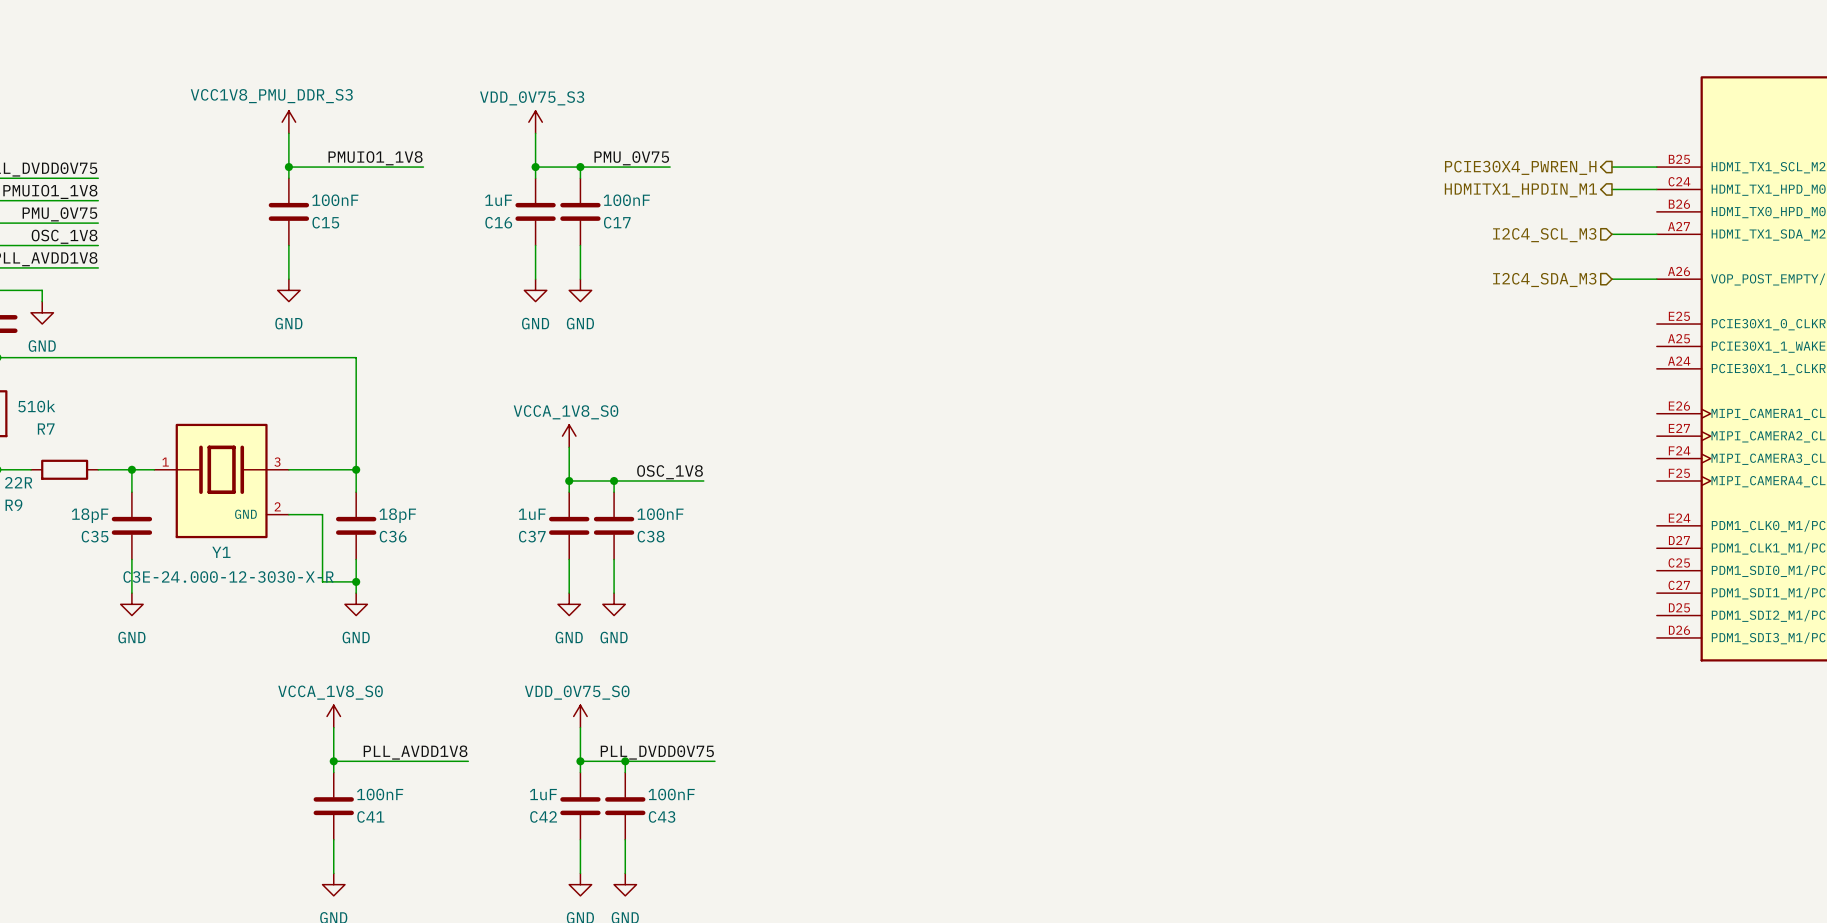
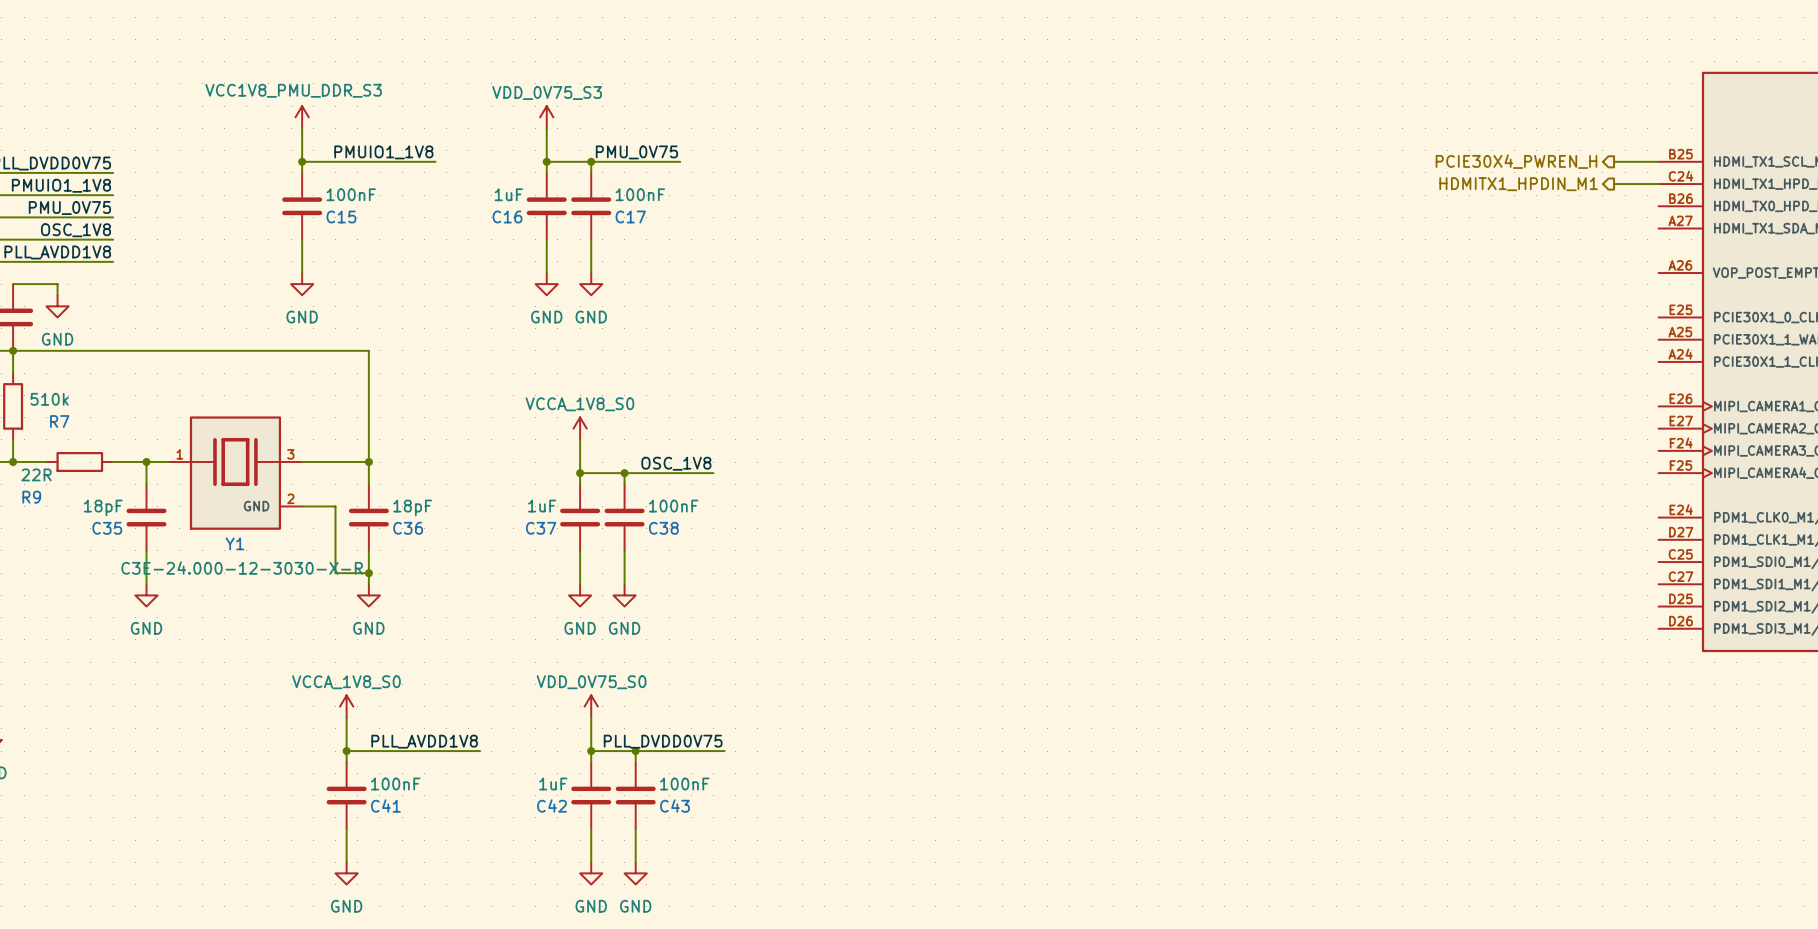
wire: (1611, 234) (1656, 234) -> none
hierarchical label: I2C4_SCL_M3 (1544, 235) -> none
wire: (1611, 279) (1656, 279) -> none
hierarchical label: I2C4_SDA_M3 (1544, 280) -> none

